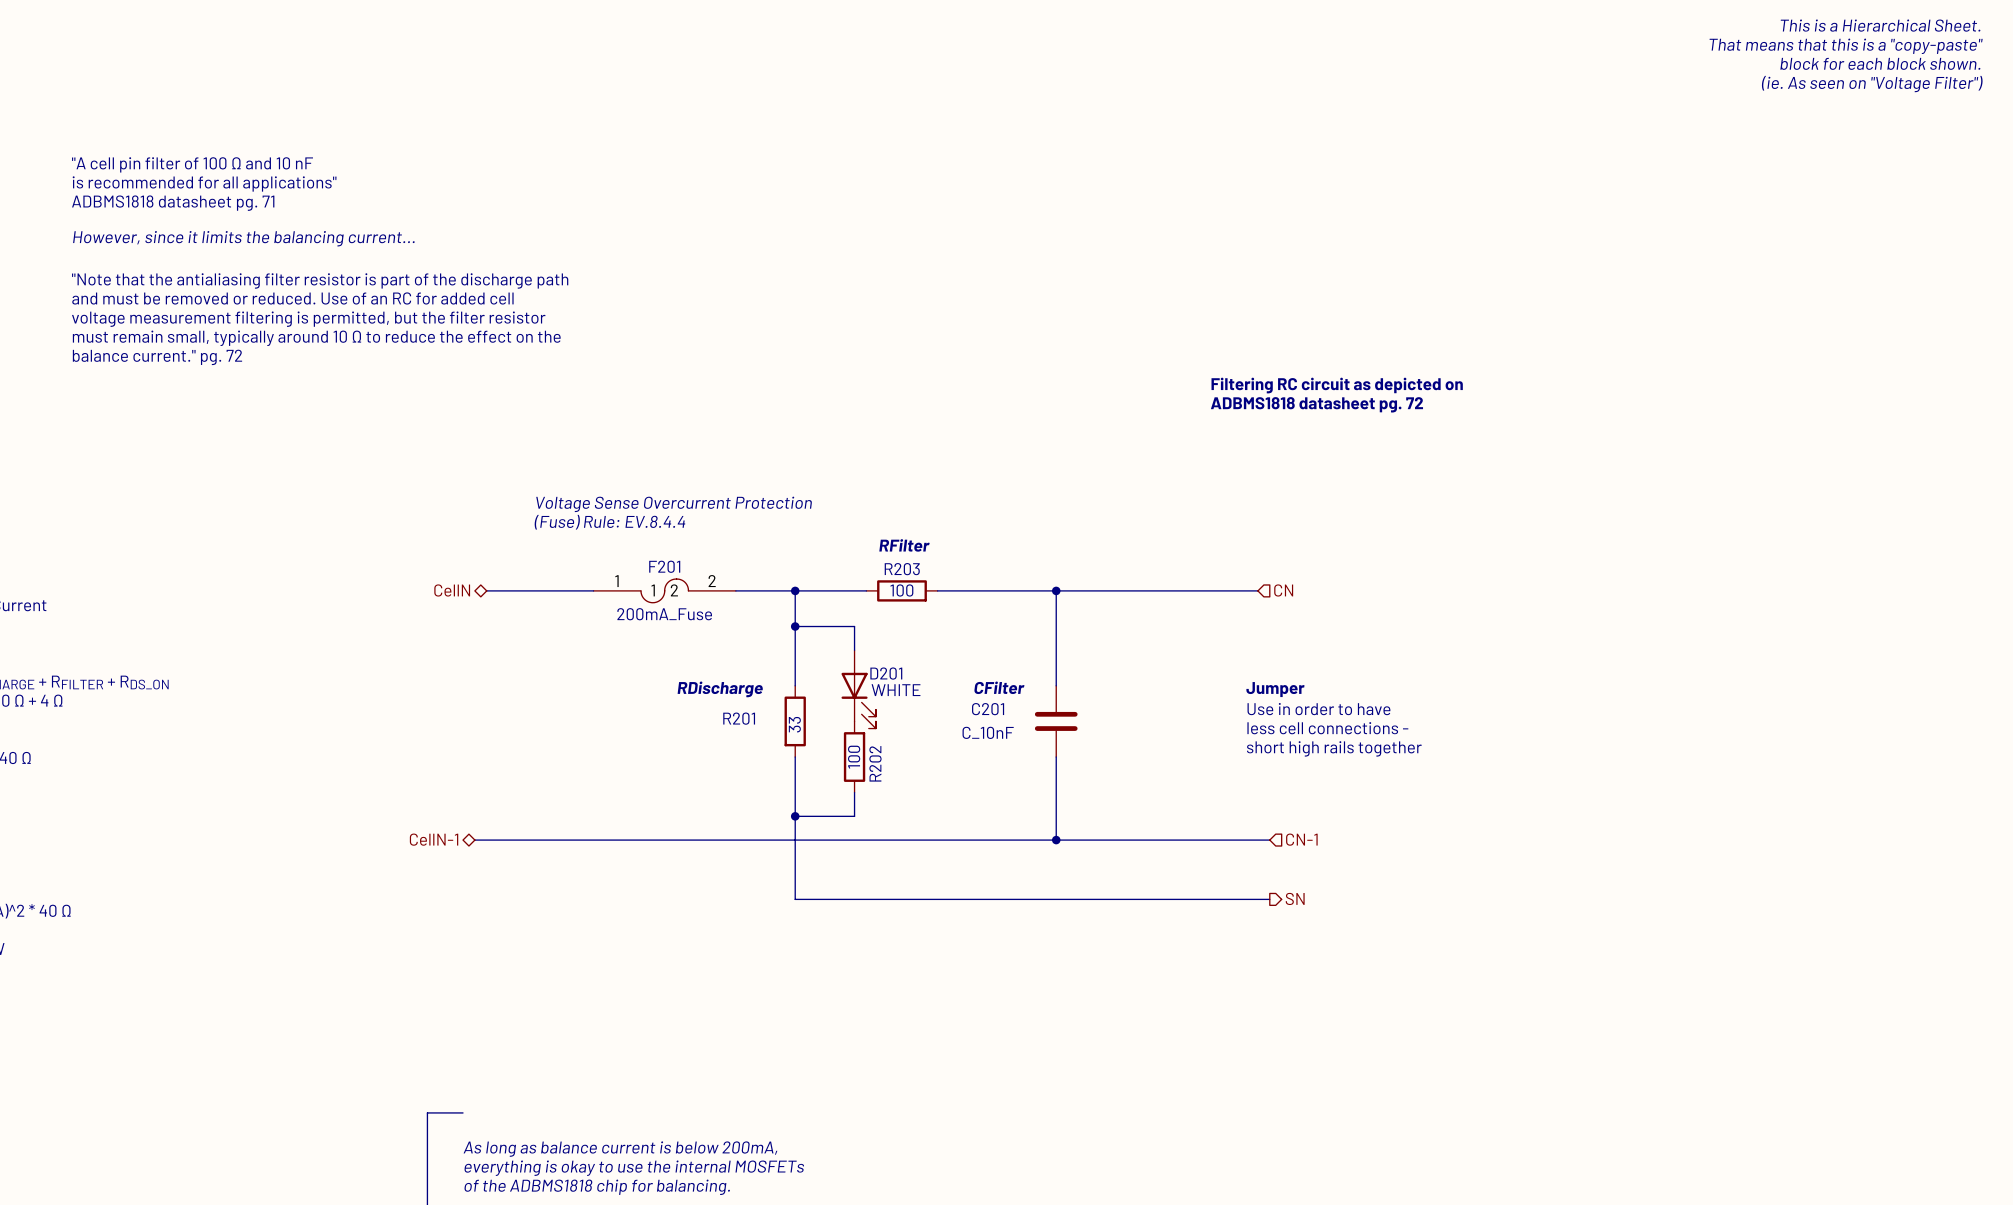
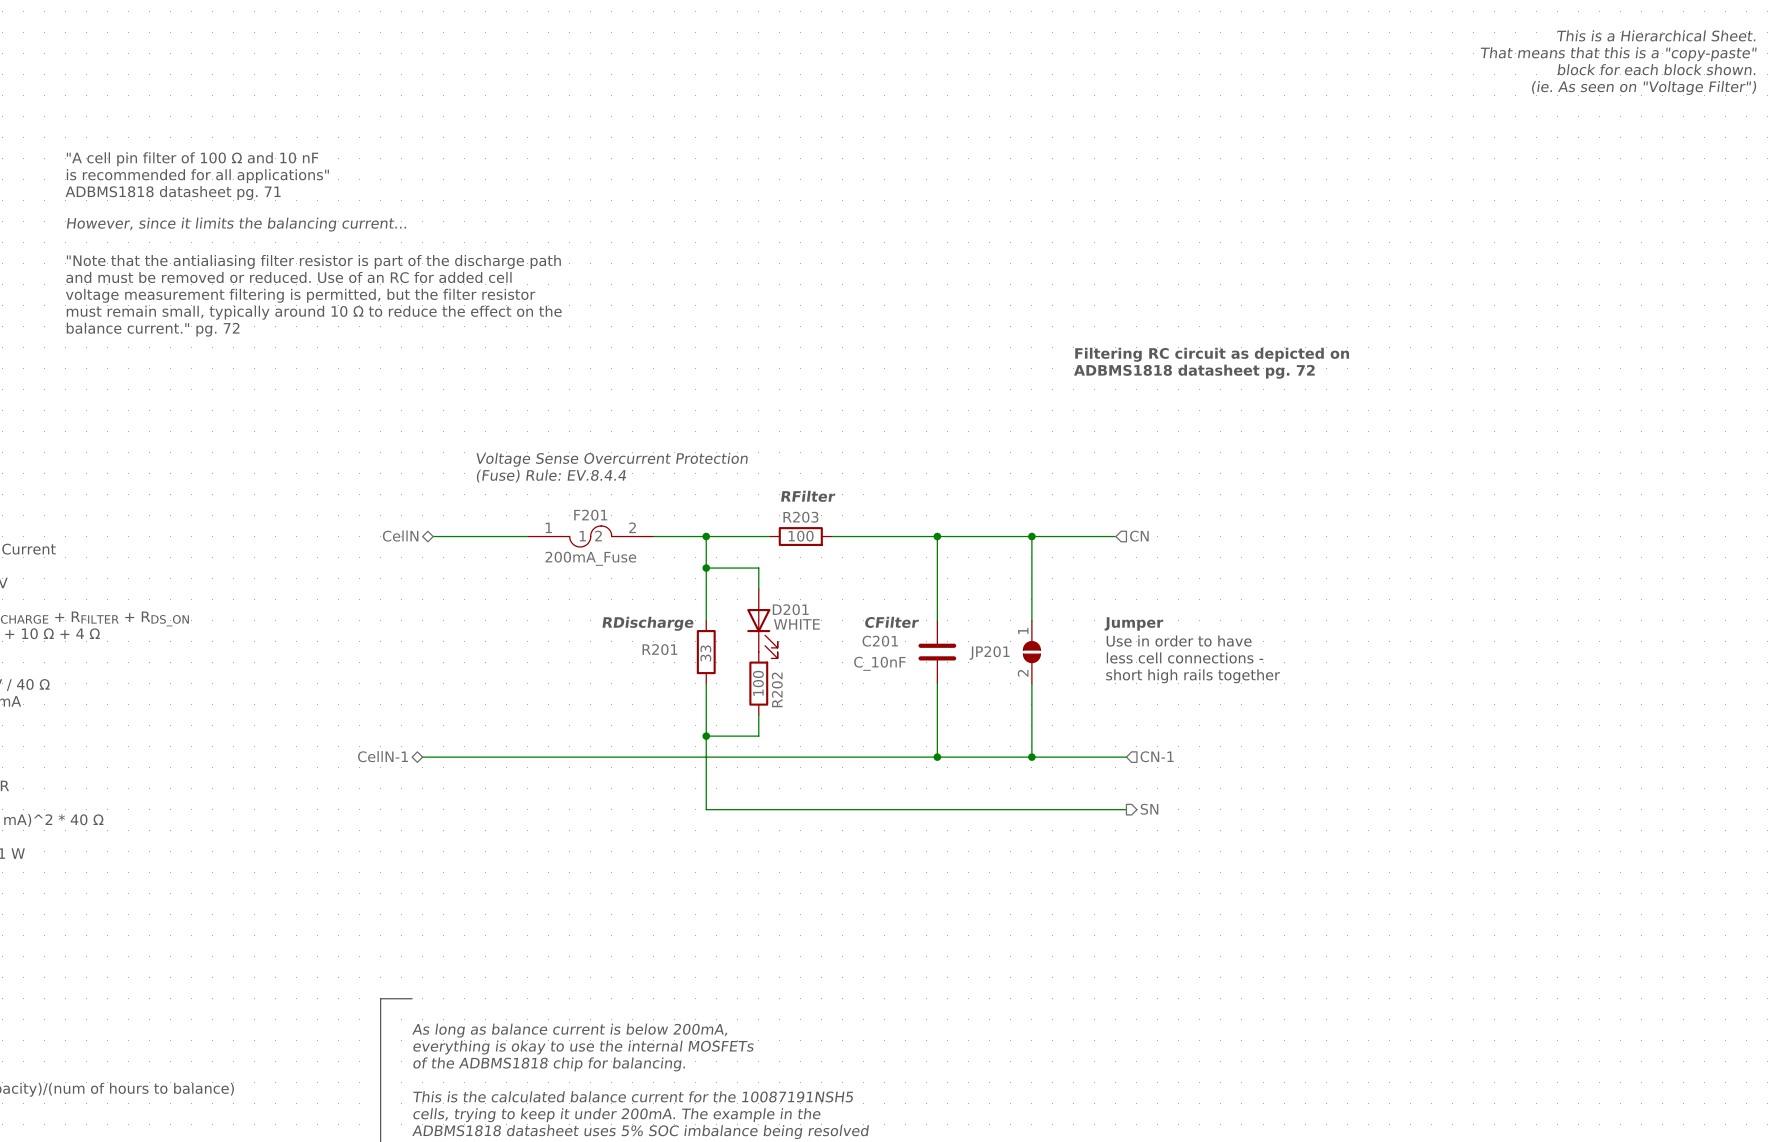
wire: none -> (1031, 536) (1031, 620)
junction: none -> (1031, 536)
JP201: none -> (1031, 652)
wire: none -> (1031, 683) (1031, 757)
junction: none -> (1031, 757)

